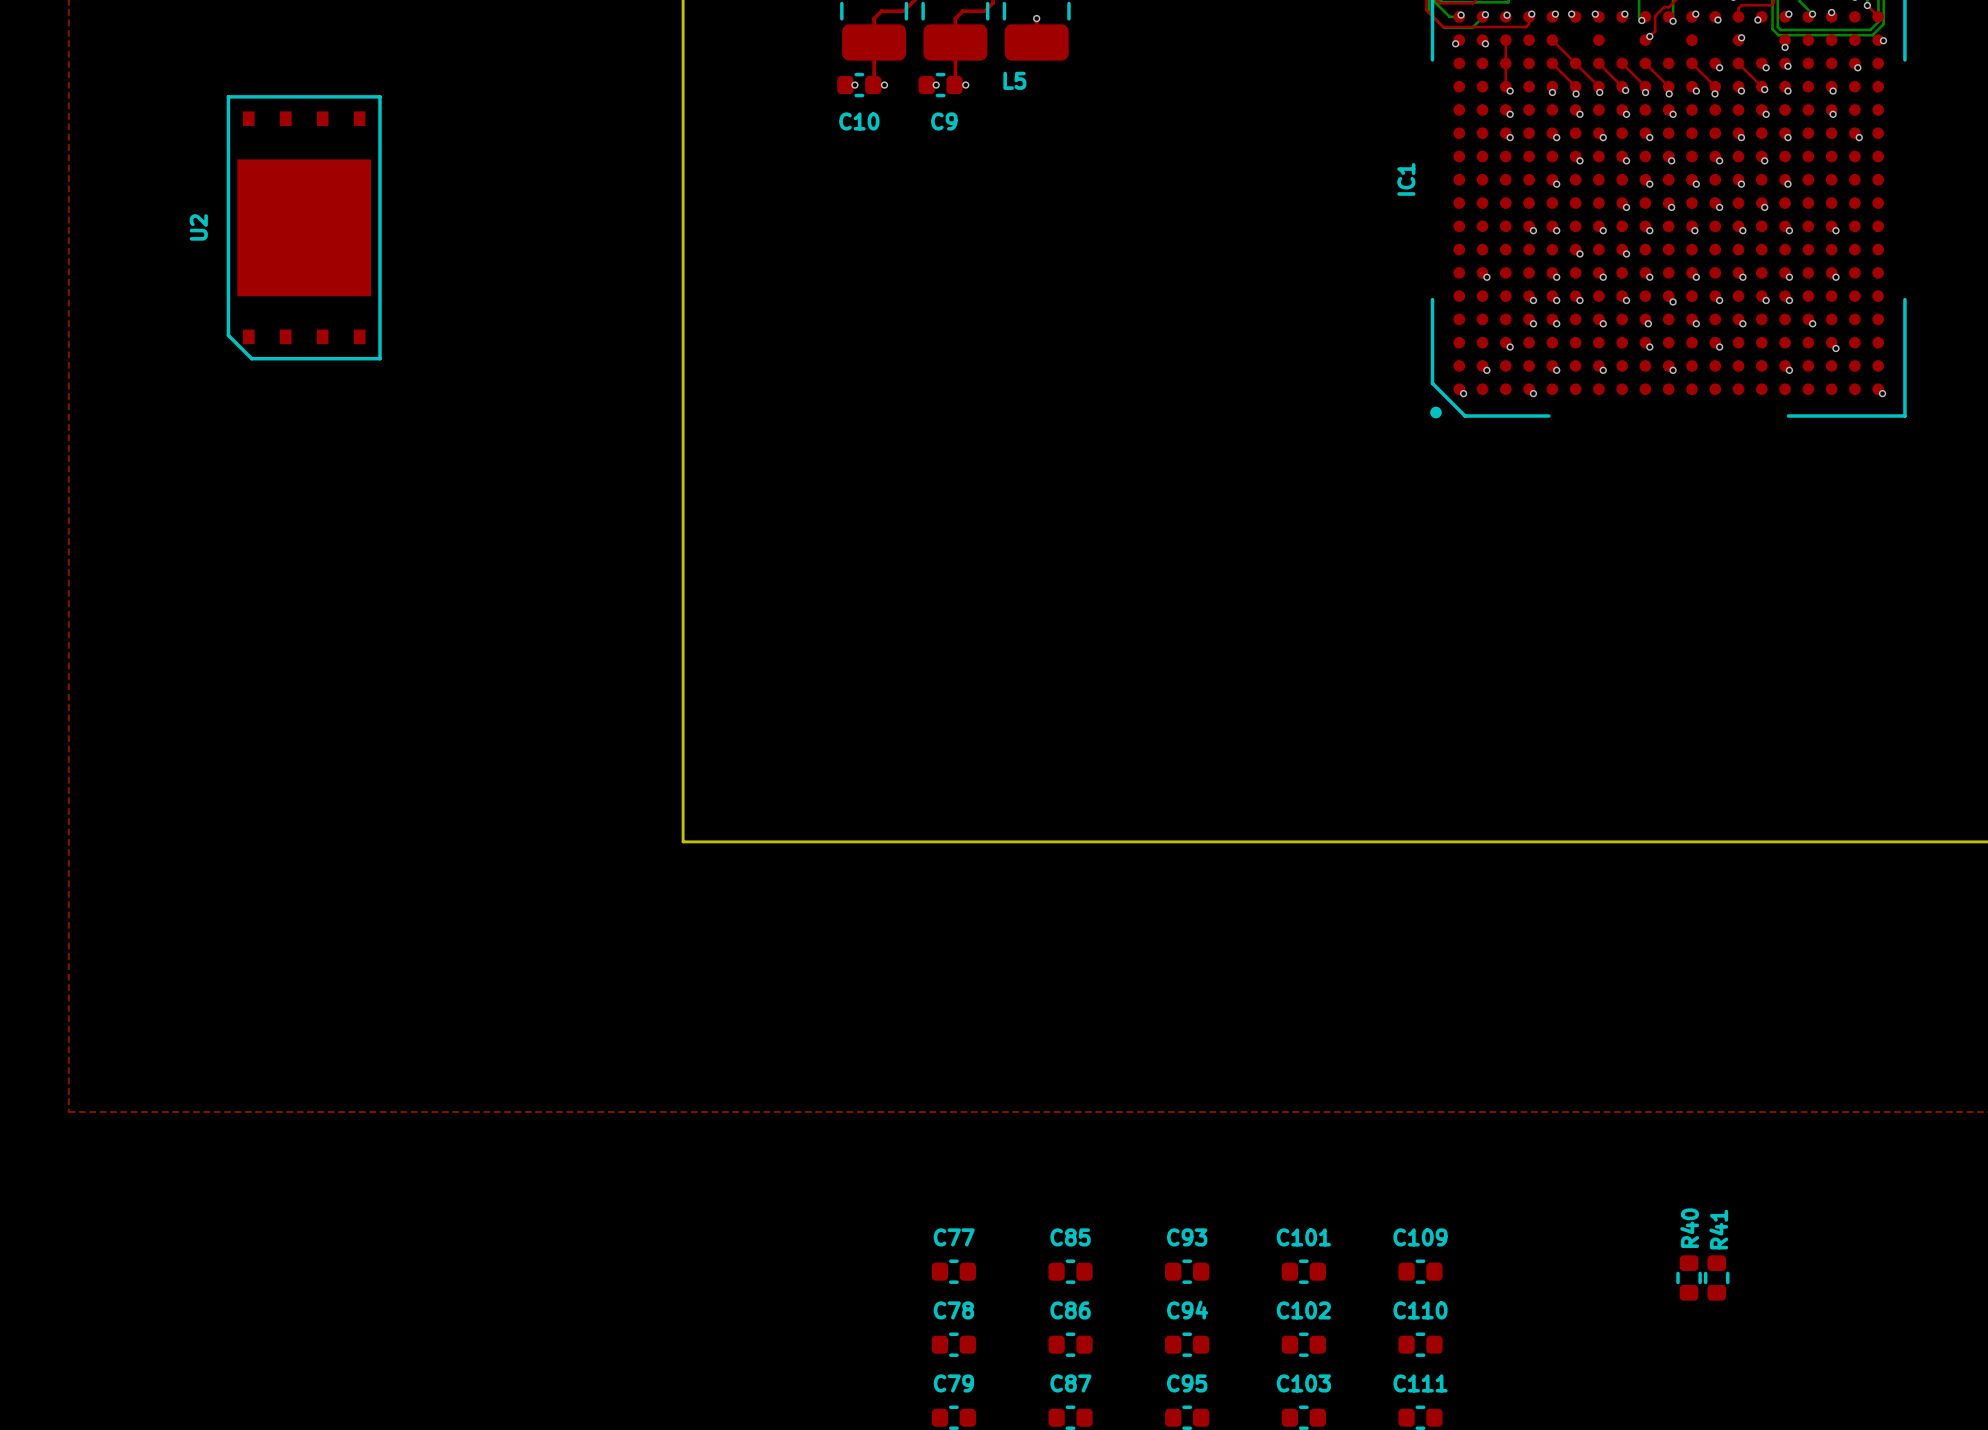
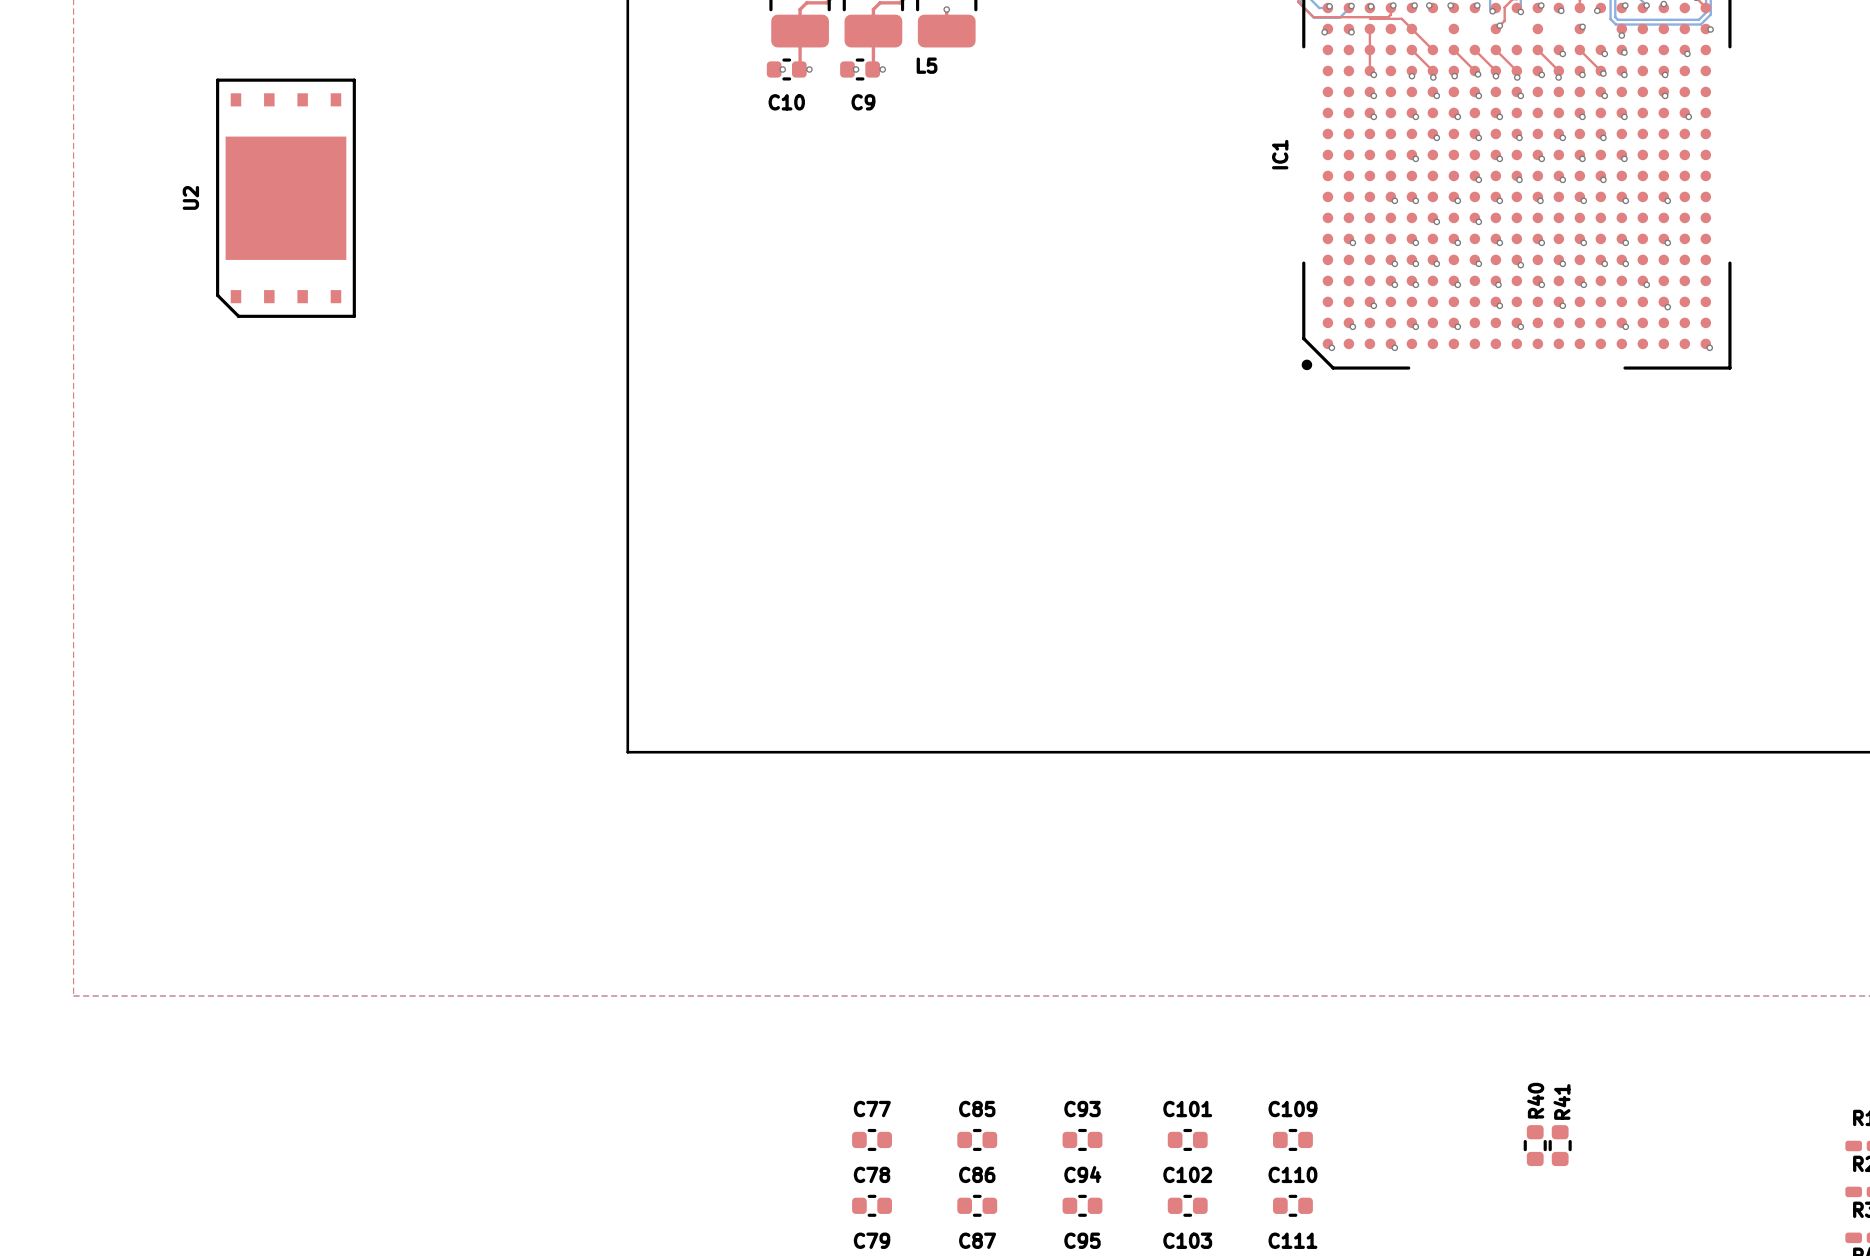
top track: none -> (1369, 18) (1401, 18) (1411, 28)
top track: (1575, 63) (1598, 86) -> none

